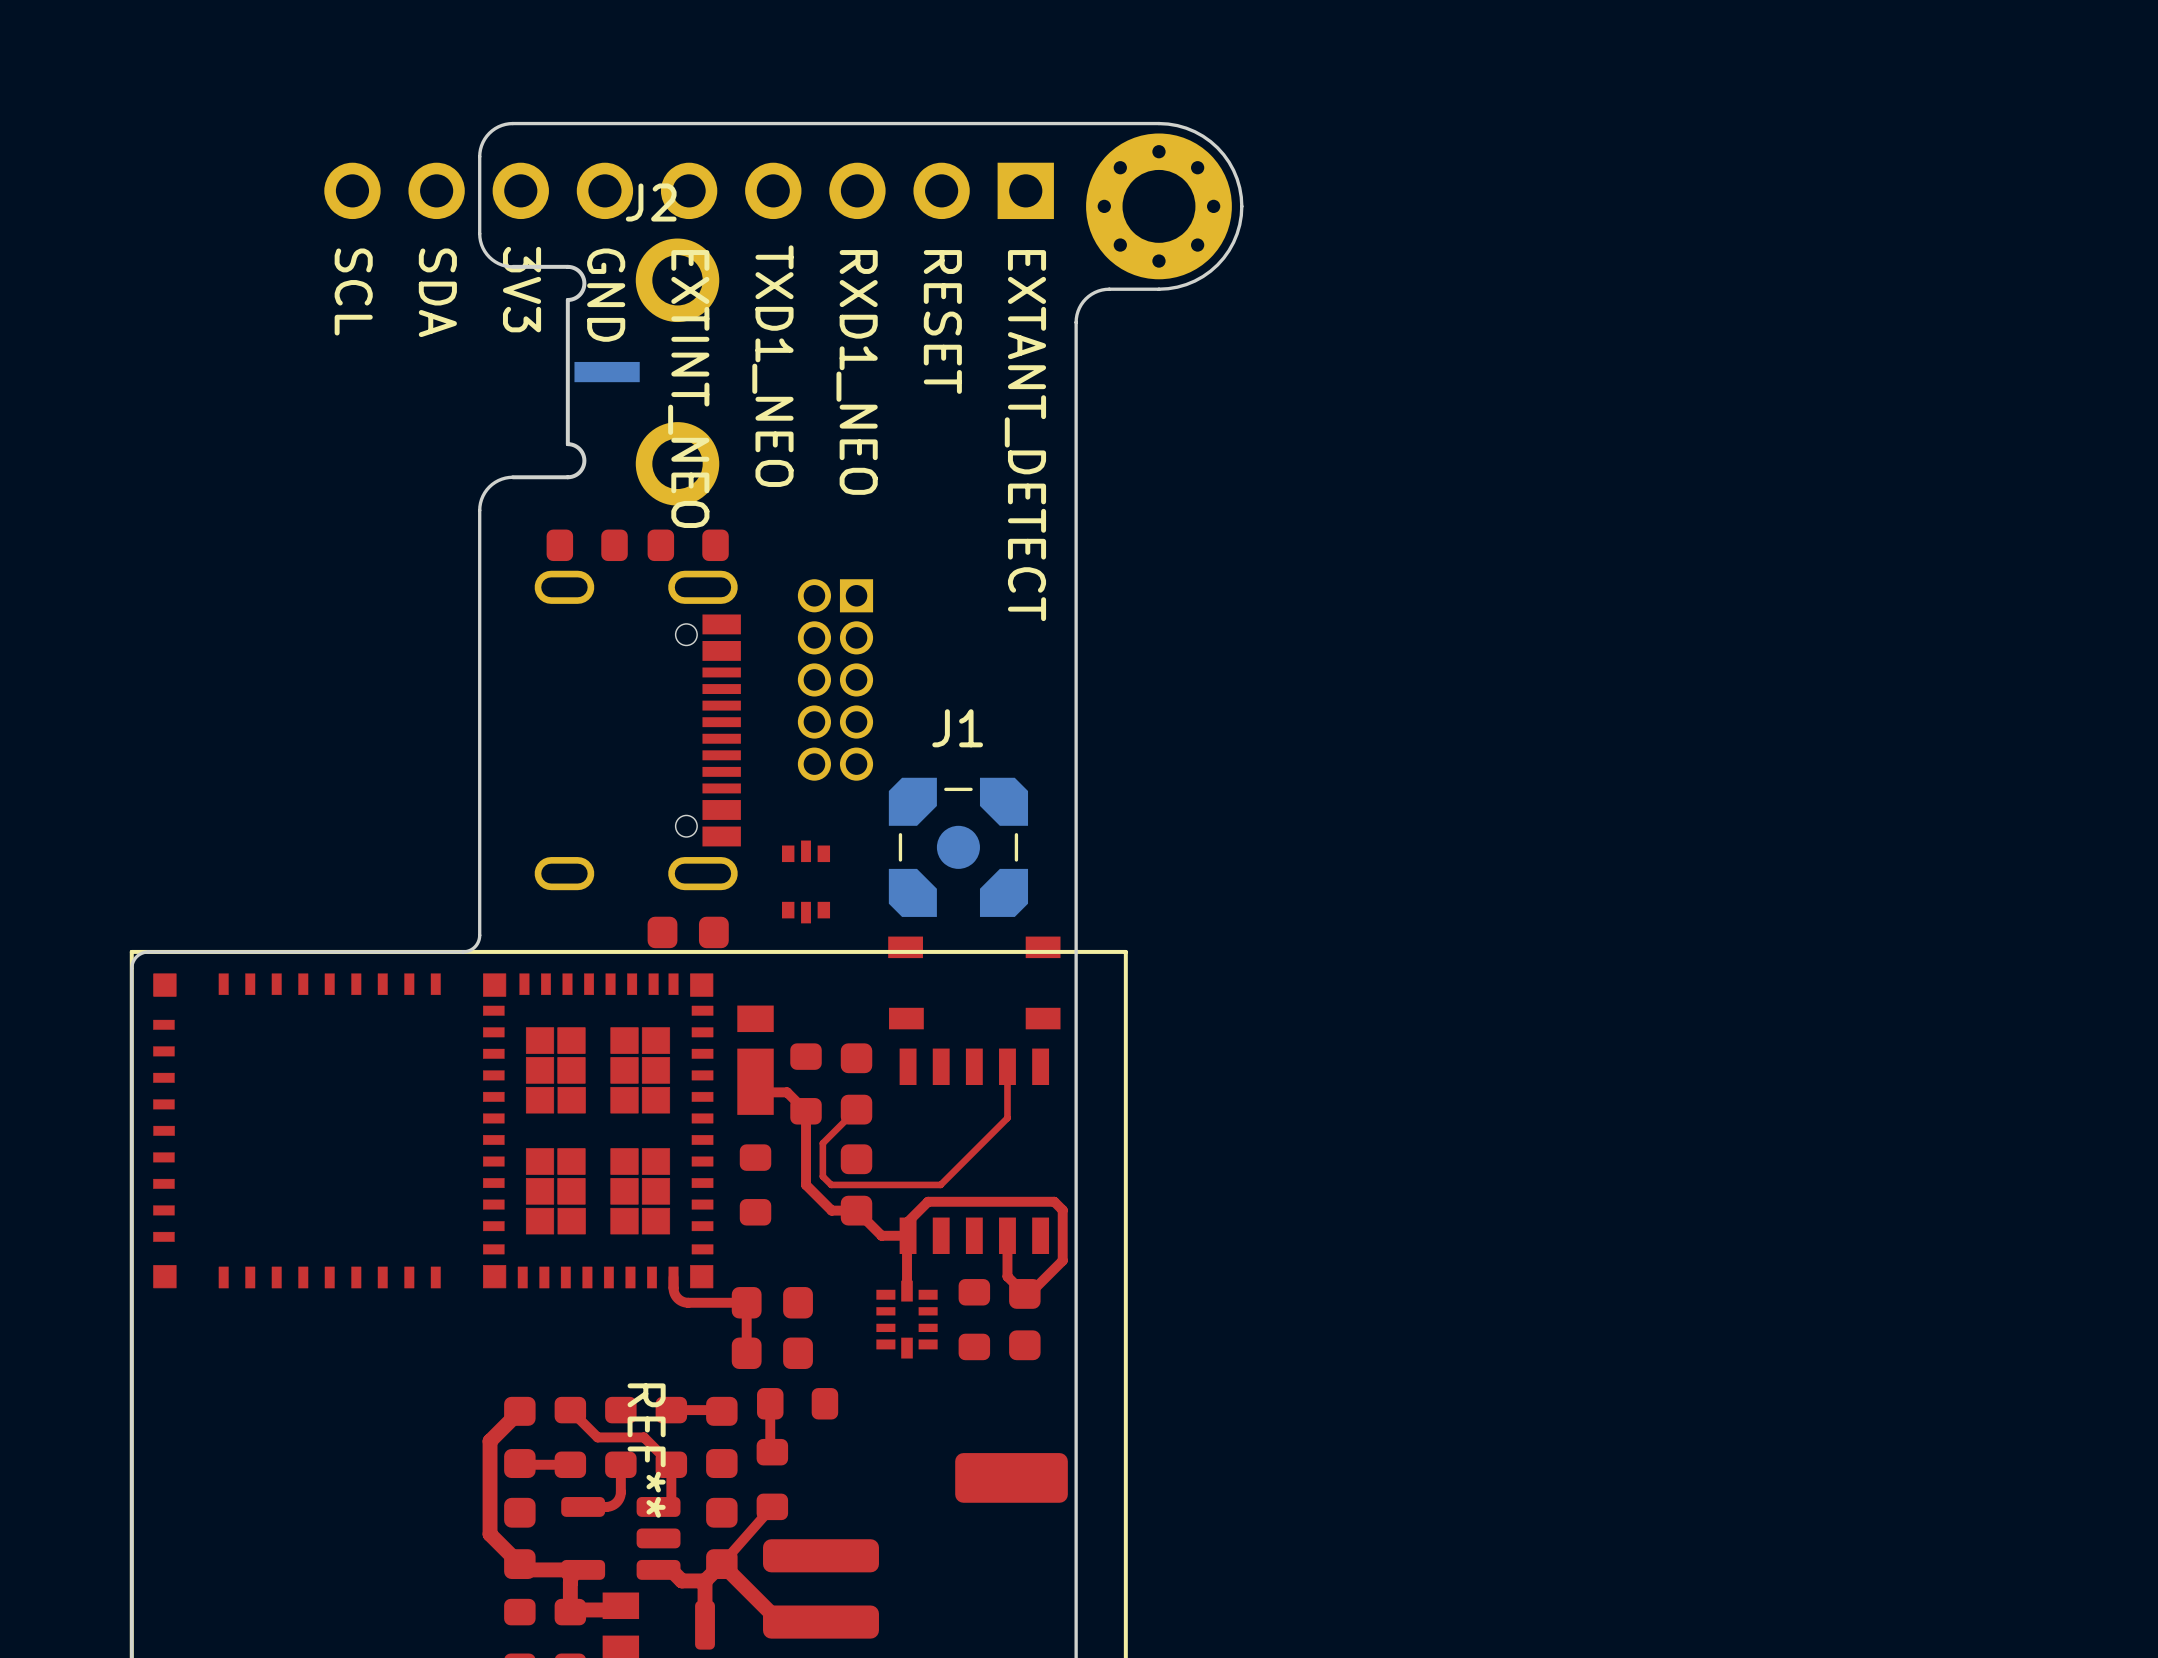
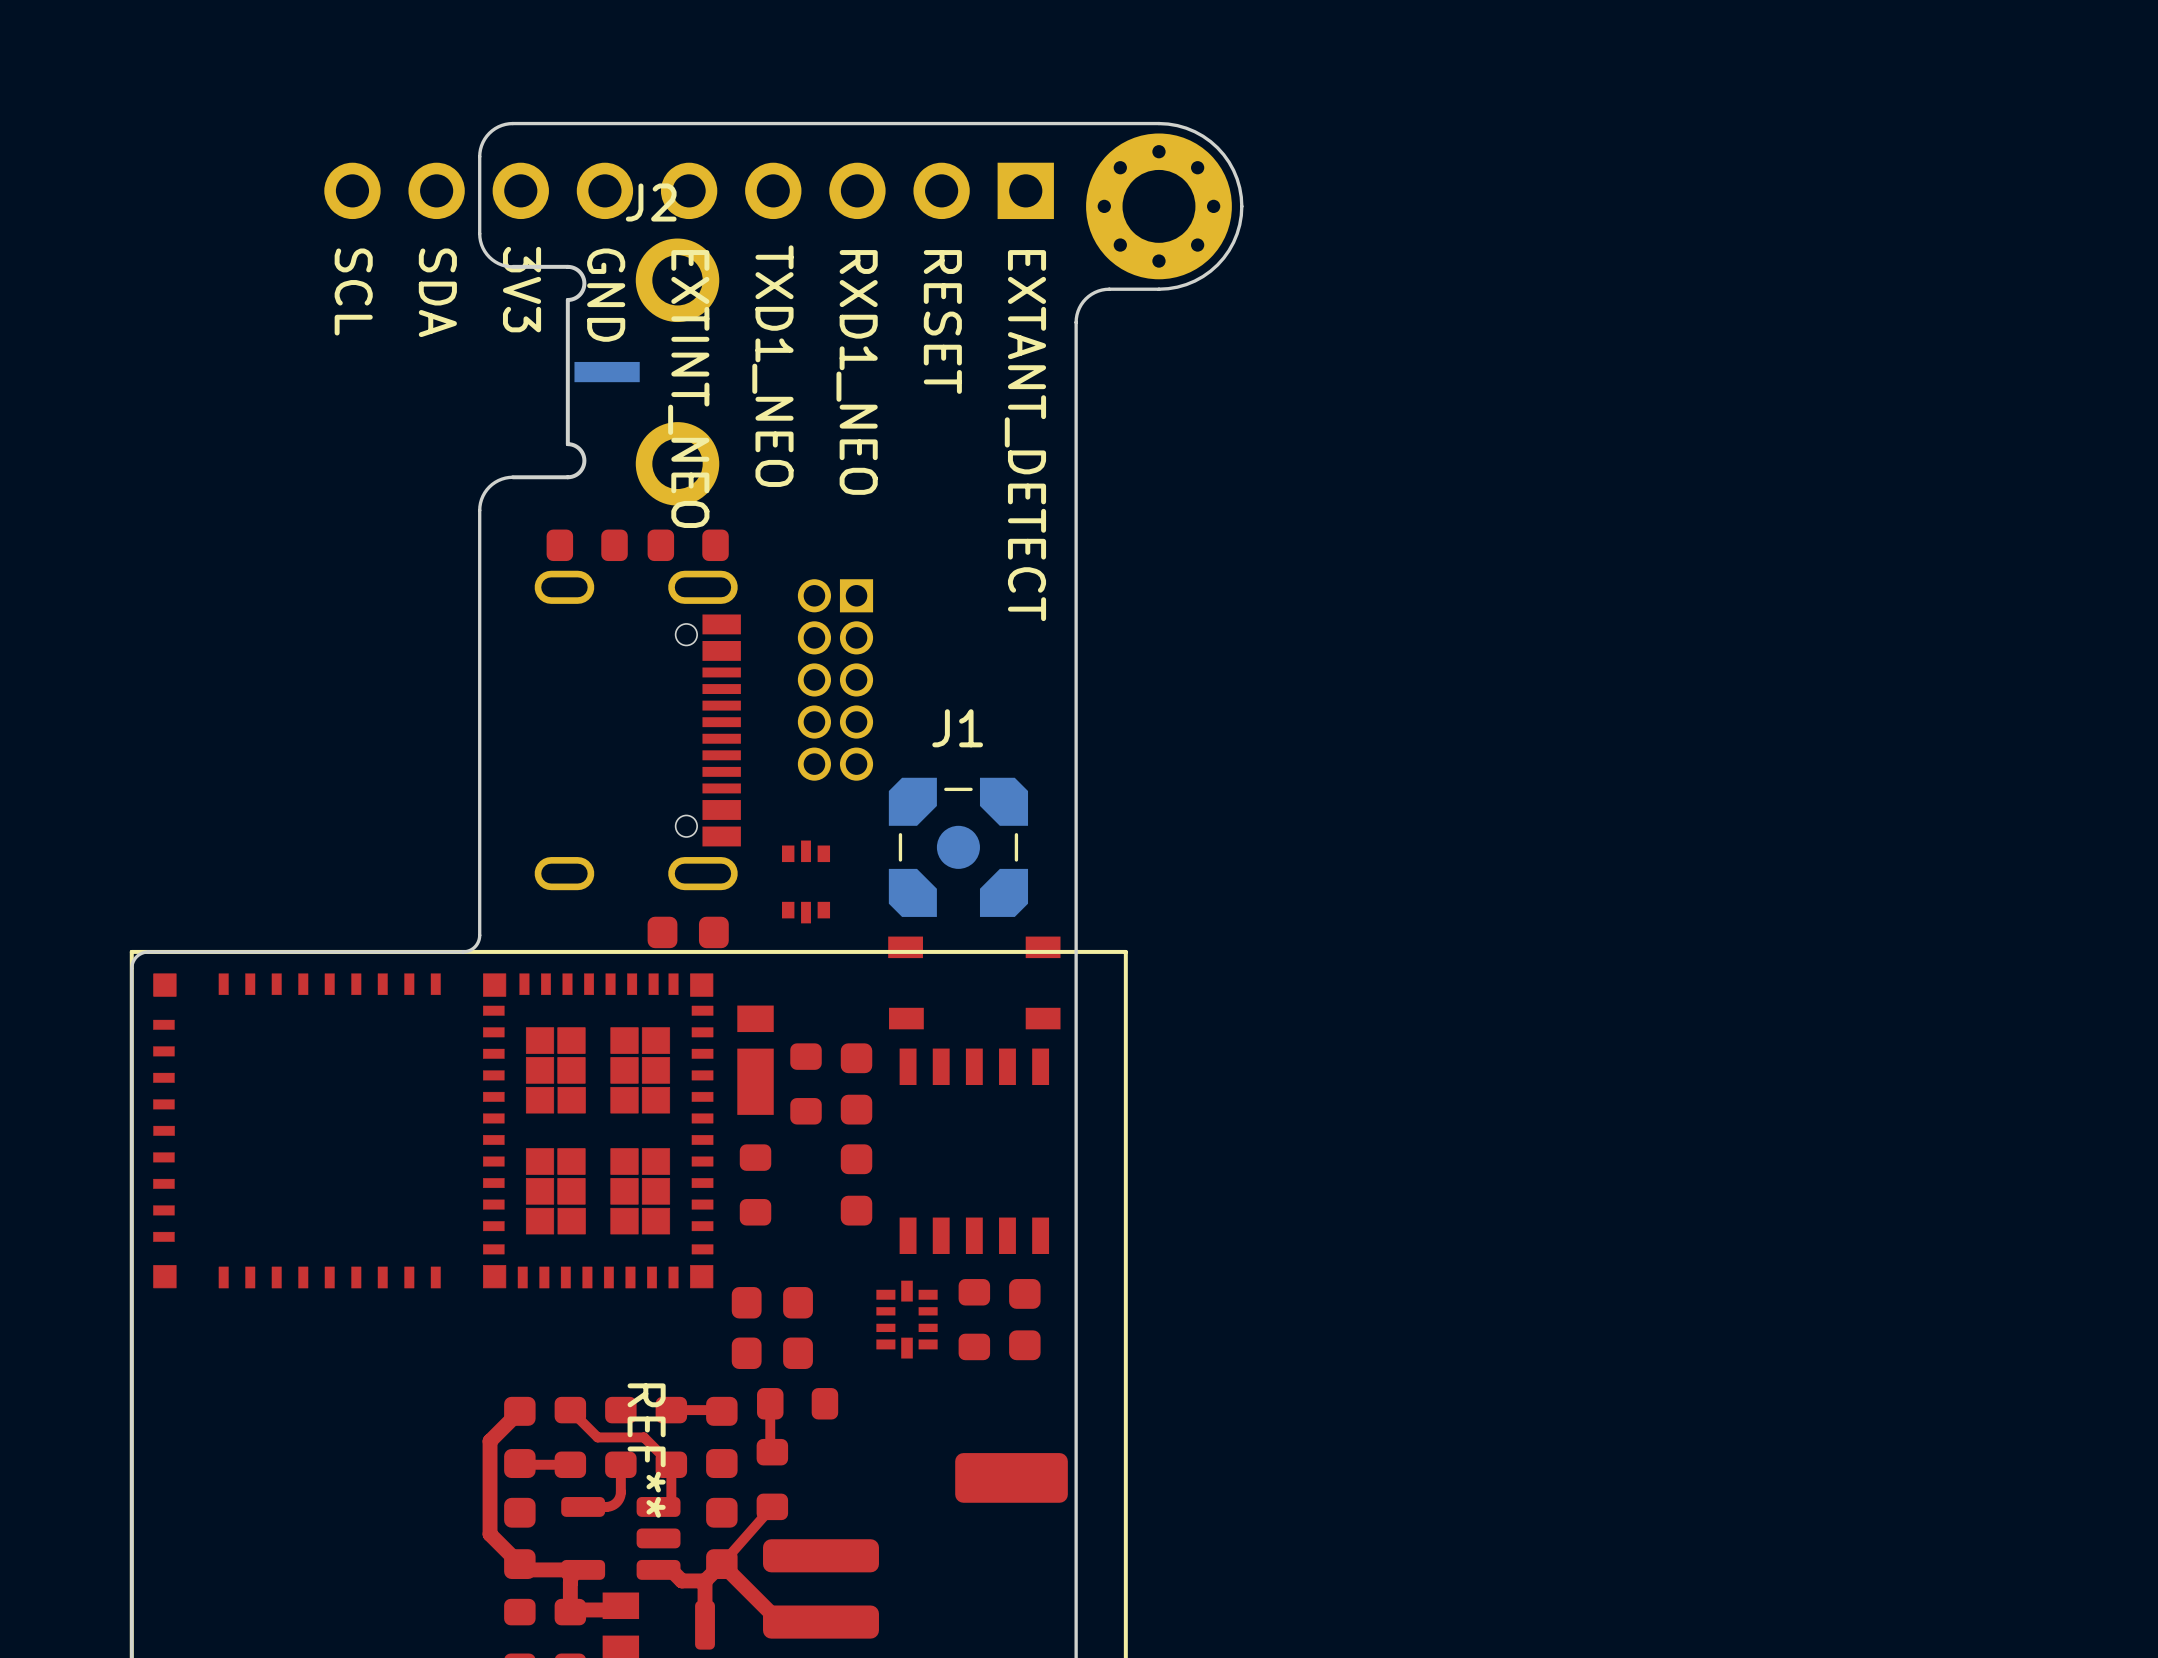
top track: (1007, 1066) (1007, 1118) (940, 1184) (831, 1184) (822, 1176) (822, 1143) (856, 1109) -> none
top track: (755, 1081) (755, 1092) (787, 1092) (806, 1111) (806, 1184) (831, 1210) (856, 1210) (881, 1235) (908, 1235) -> none
top track: (908, 1235) (907, 1291) -> none
top track: (1007, 1235) (1007, 1276) (1024, 1293) (1029, 1293) (1062, 1260) (1062, 1210) (1054, 1201) (928, 1201) (908, 1221) (908, 1235) -> none
top track: (673, 1277) (674, 1293) (682, 1301) (746, 1302) (746, 1353) -> none

